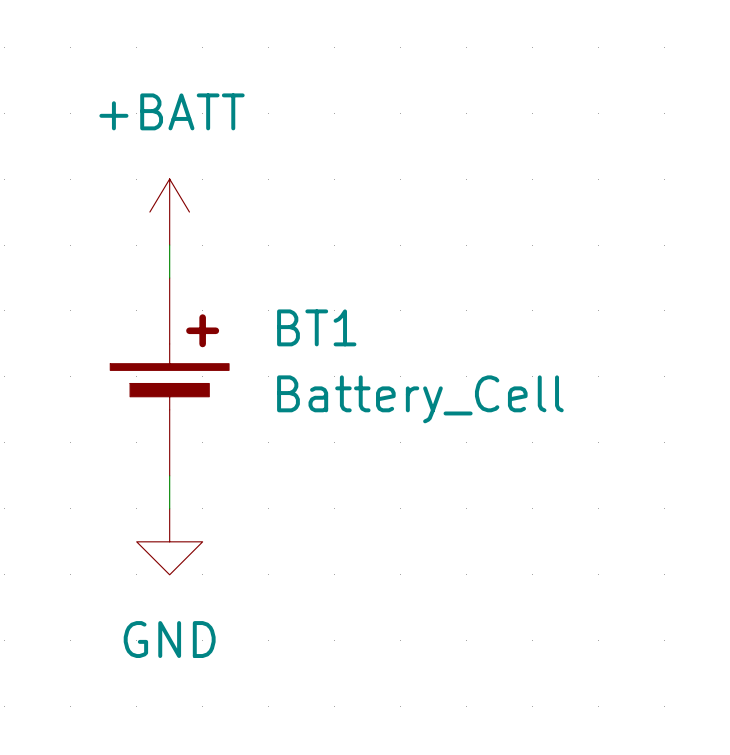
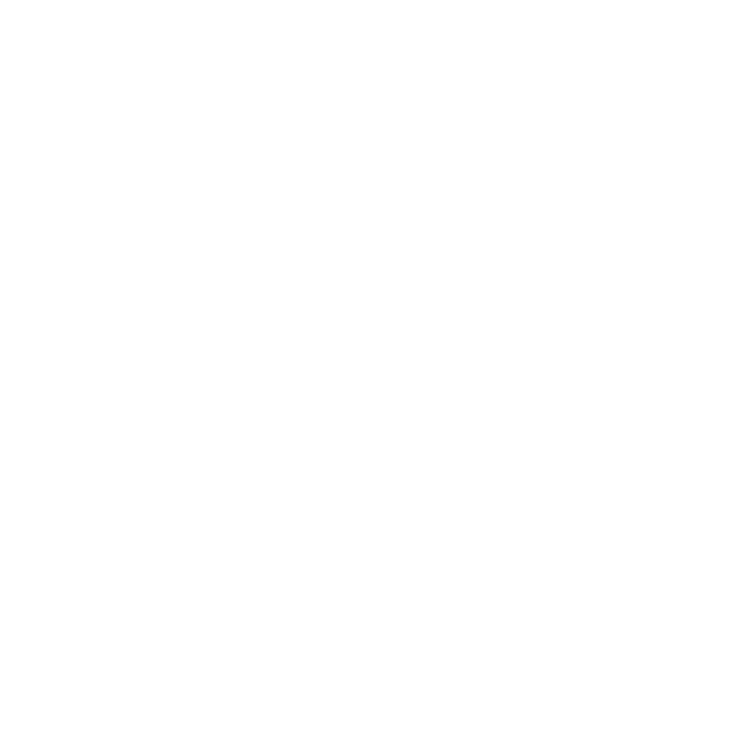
power symbol: +BATT (169, 212) -> none
wire: (169, 245) (169, 278) -> none
BT1: Battery_Cell (169, 376) -> none
wire: (169, 475) (169, 508) -> none
power symbol: GND (169, 541) -> none

